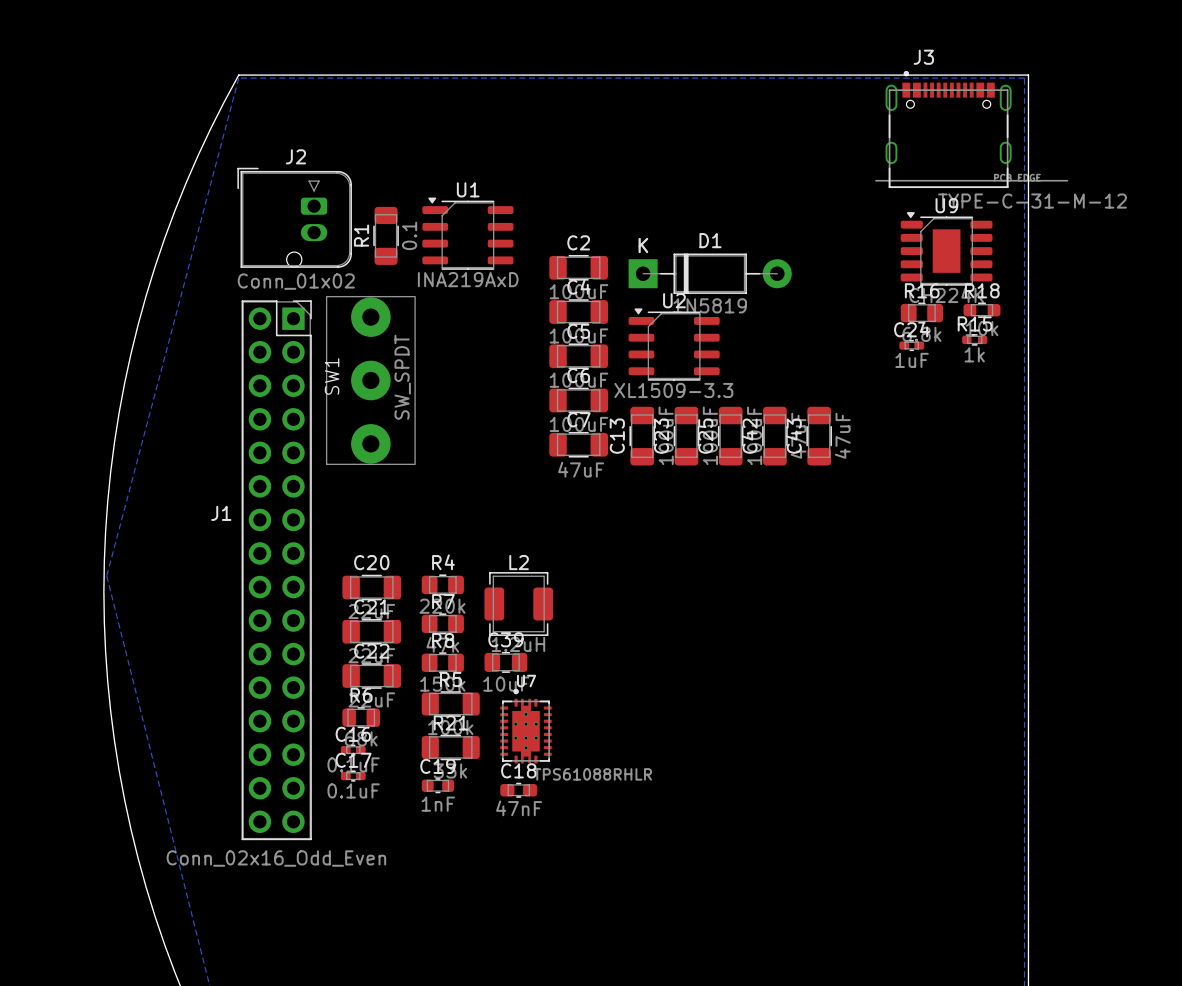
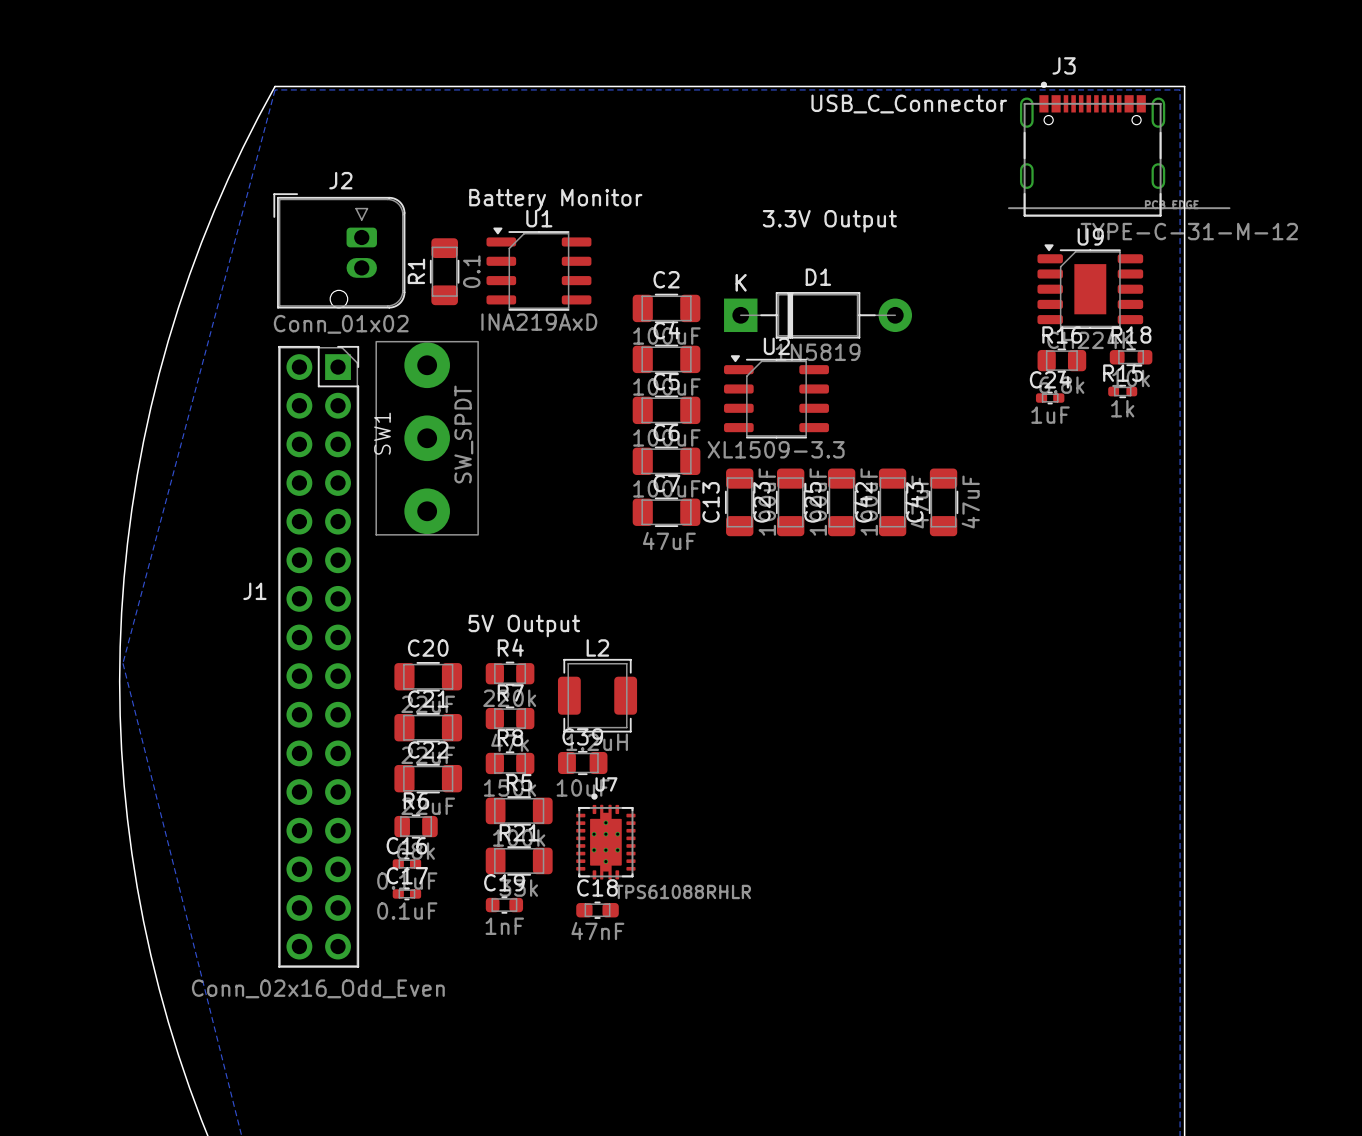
text: none -> USB_C_Connector (909, 104)
text: none -> Battery Monitor (555, 200)
text: none -> 3.3V Output (829, 221)
text: none -> 5V Output (524, 626)

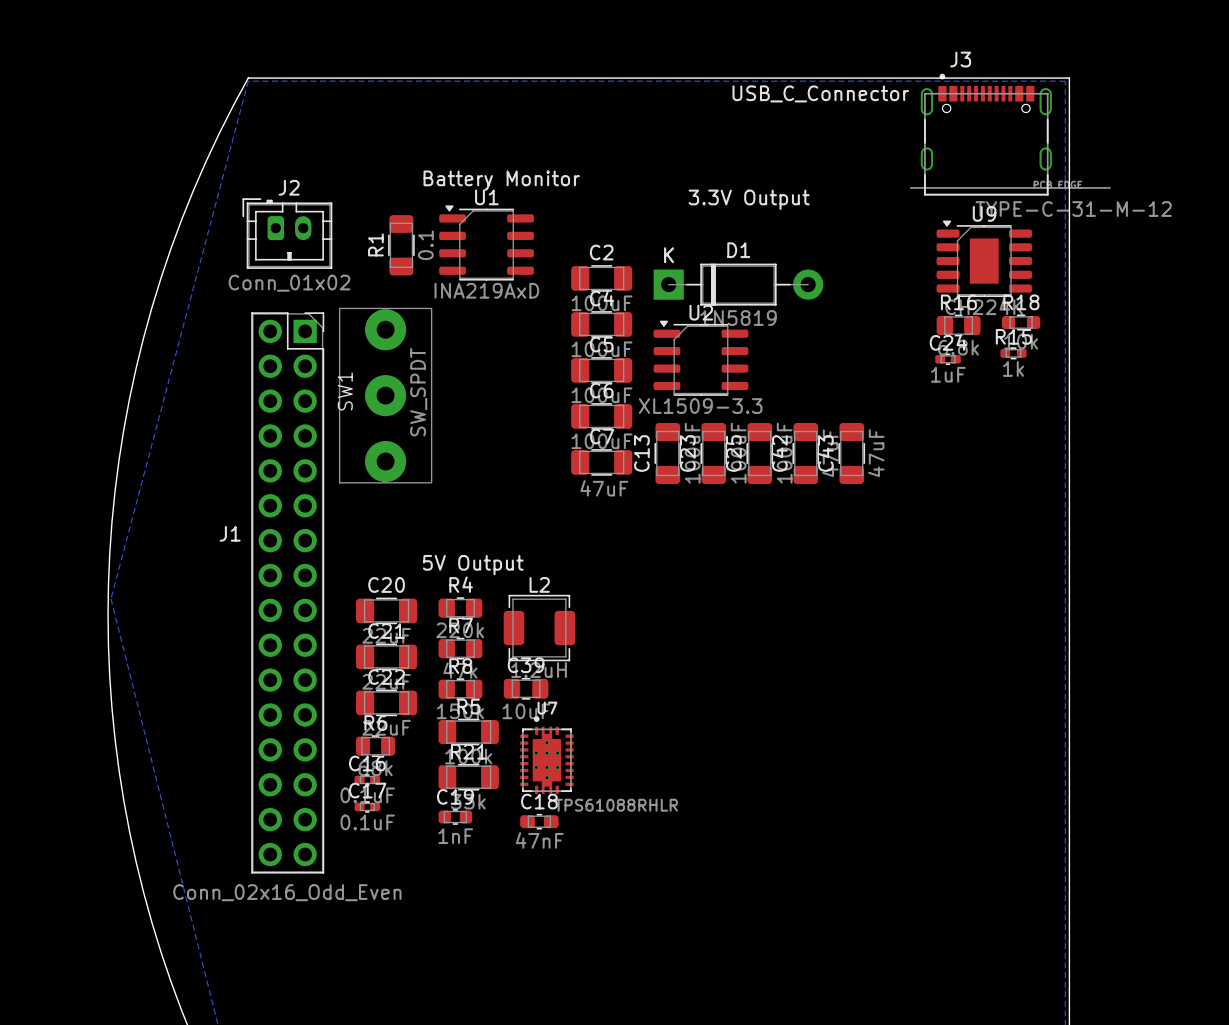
J2 footprint: [273, 193, 406, 309] -> [242, 198, 333, 269]

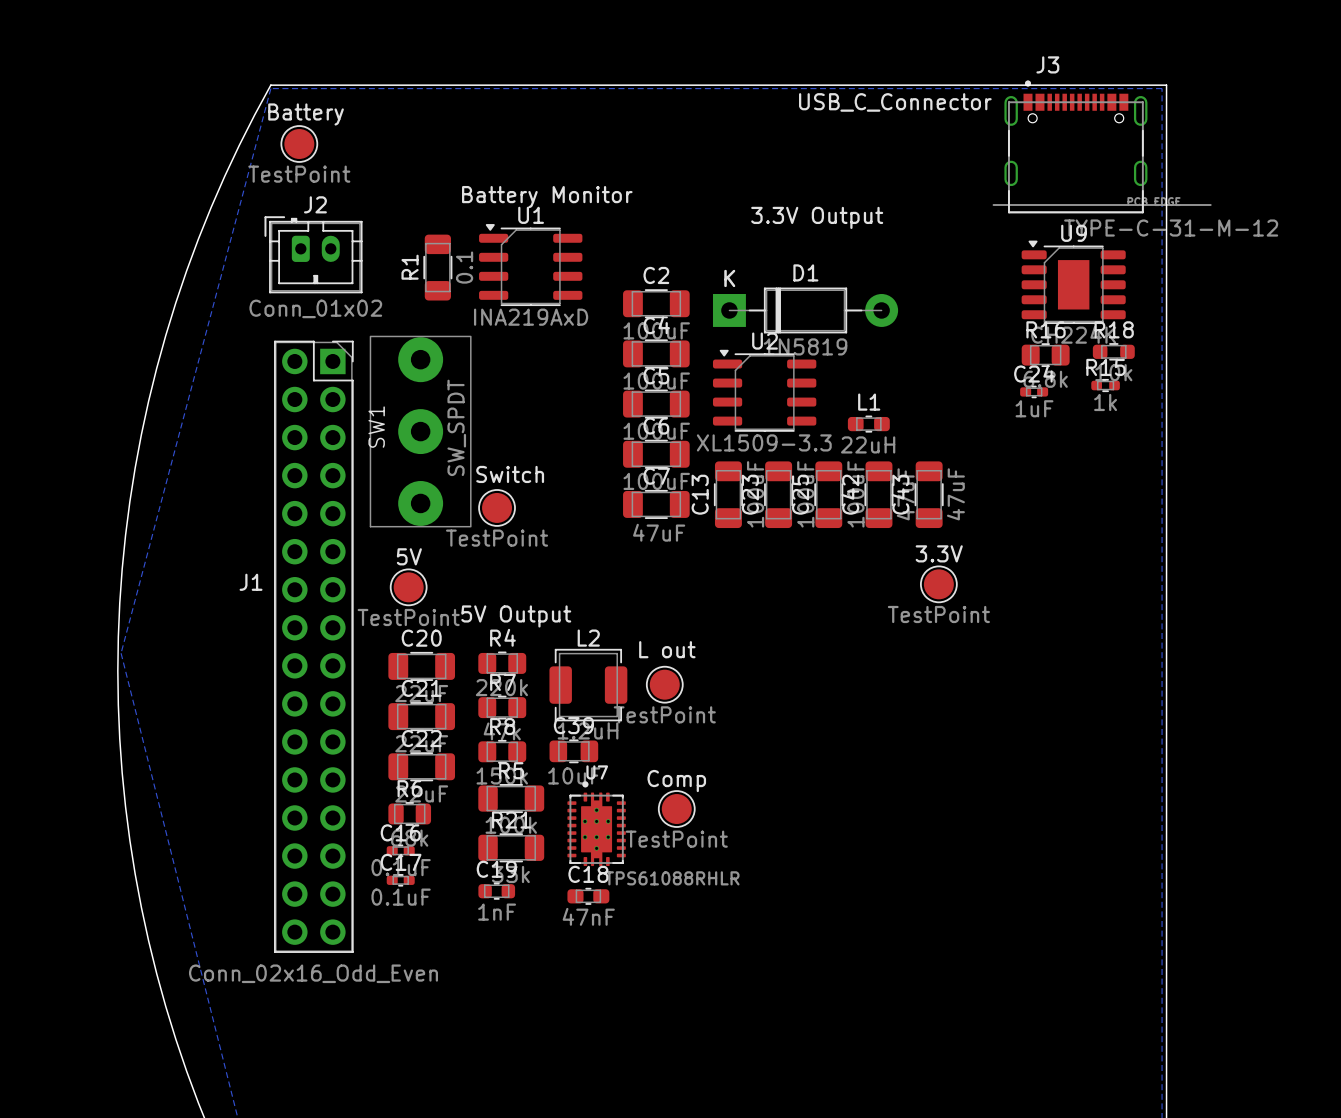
Battery: none -> TestPoint (299, 144)
L1: none -> 22uH (868, 424)
Switch: none -> TestPoint (497, 507)
3.3V: none -> TestPoint (938, 584)
5V: none -> TestPoint (408, 587)
L out: none -> TestPoint (664, 684)
Comp: none -> TestPoint (676, 809)

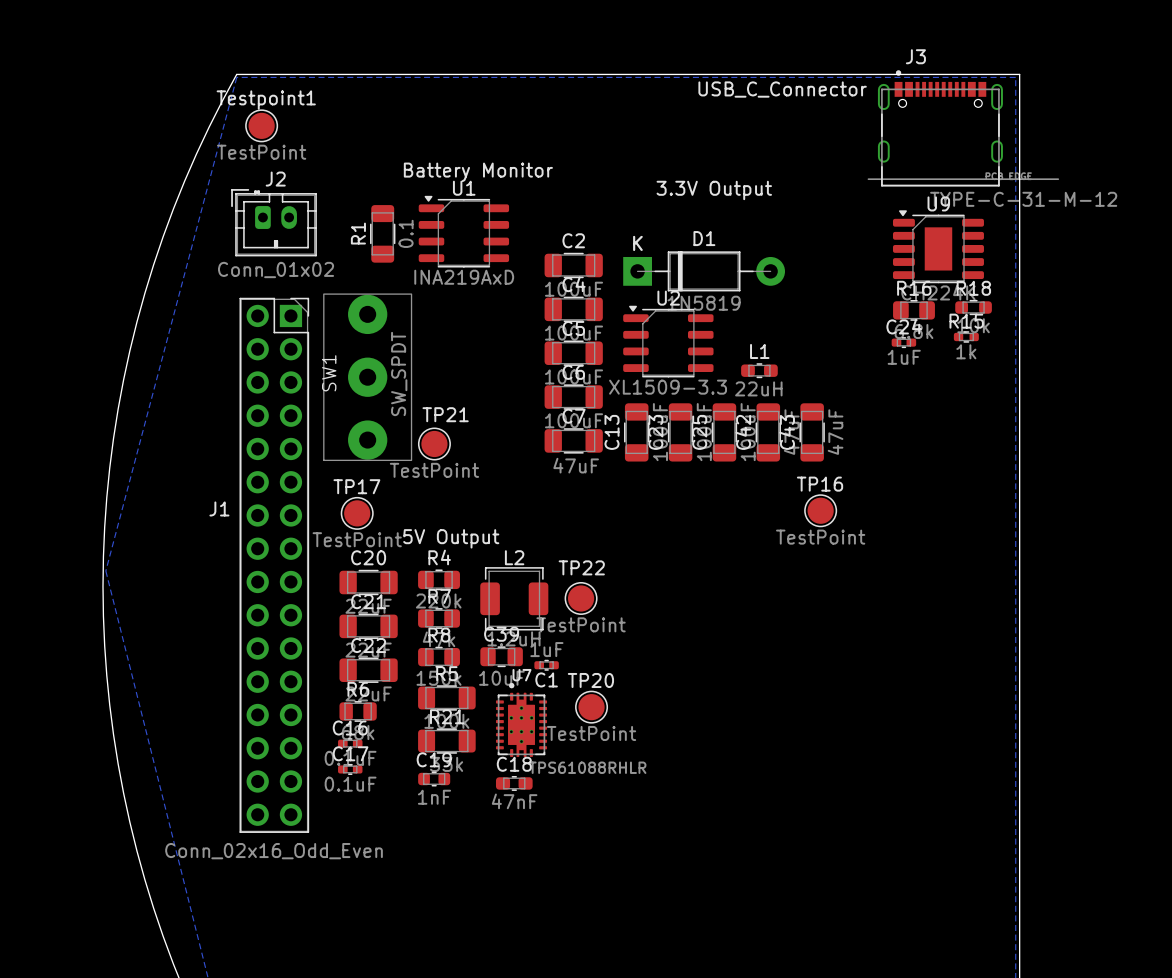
Battery name: Battery (306, 114) -> Testpoint1 (266, 100)
Switch name: Switch (510, 474) -> TP21 (445, 414)
3.3V name: 3.3V (939, 553) -> TP16 (820, 484)
5V name: 5V (409, 556) -> TP17 (356, 486)
L out name: L out (667, 649) -> TP22 (581, 567)
C1: none -> 1uF (546, 665)
Comp name: Comp (676, 781) -> TP20 (590, 680)

